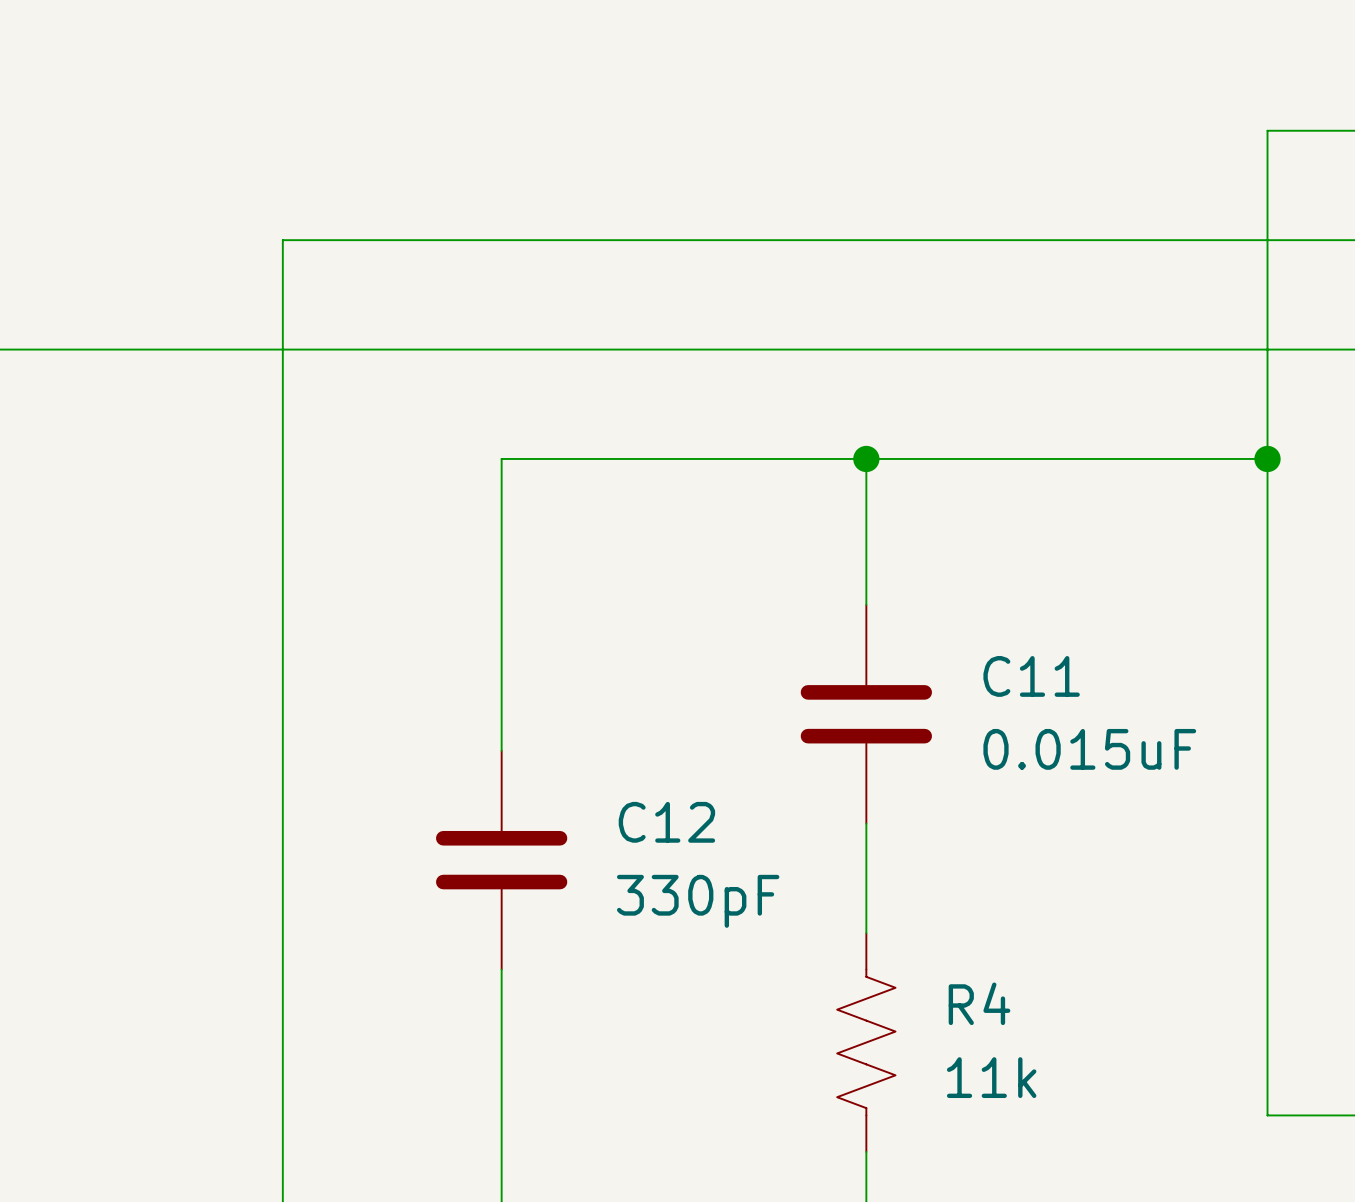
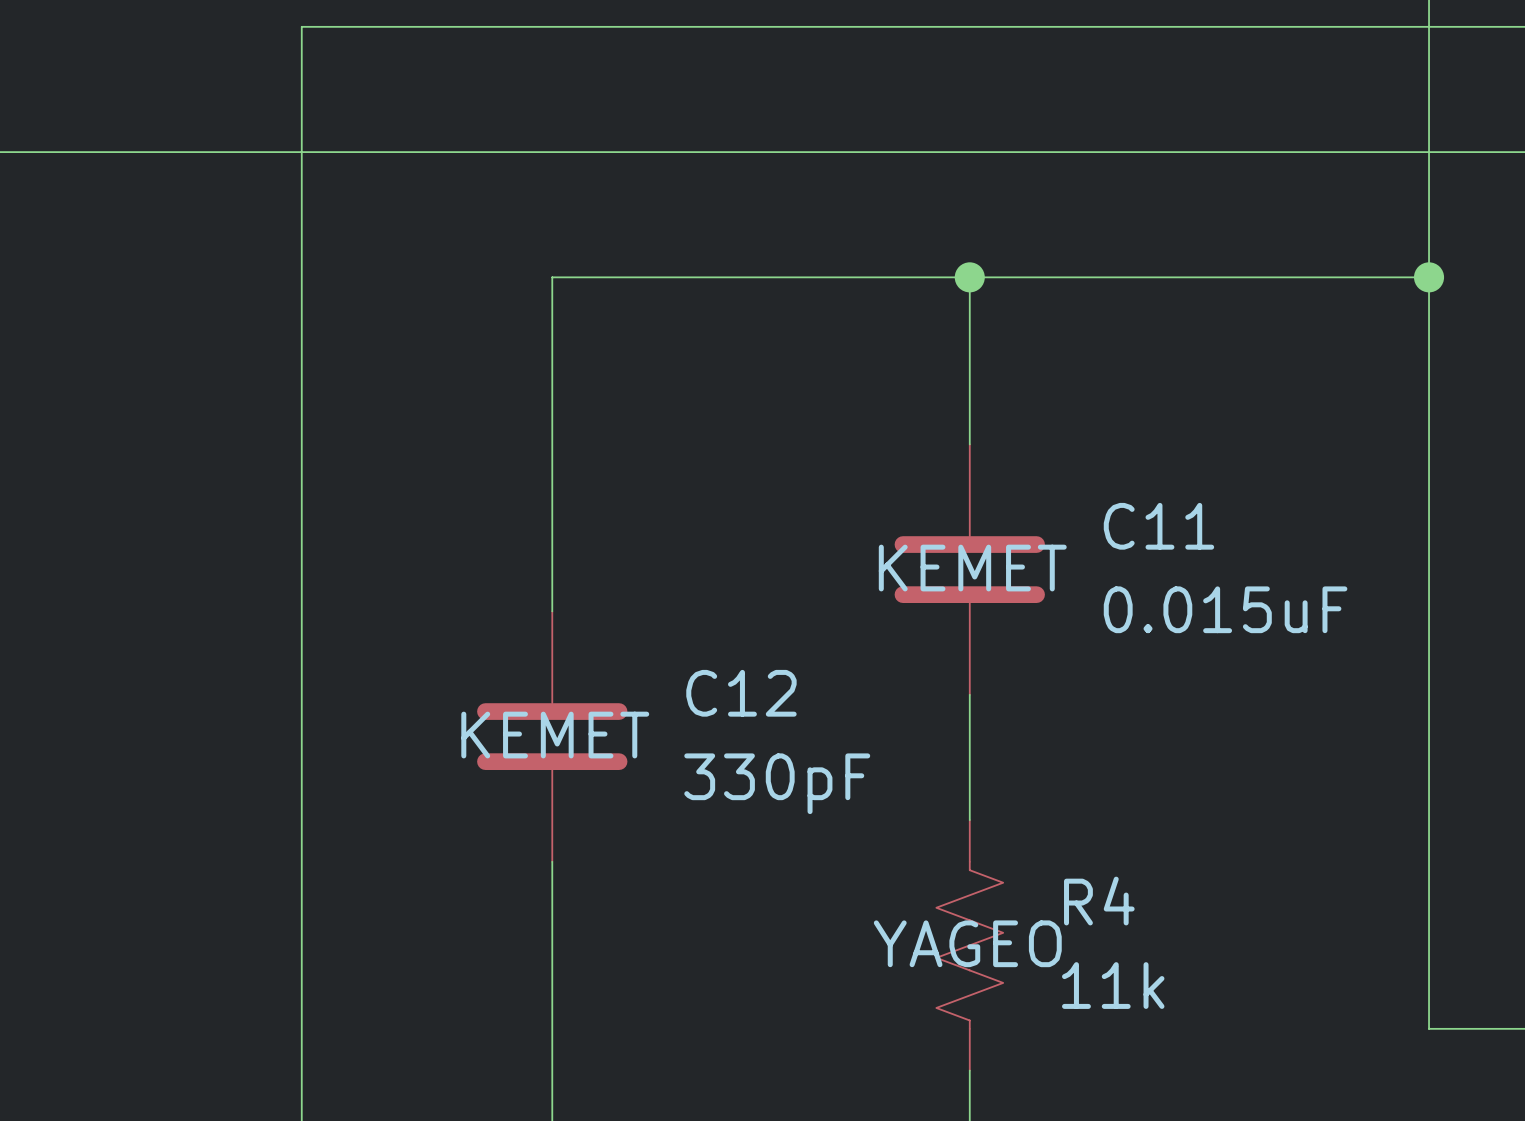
C11 text: none -> KEMET (972, 568)
C12 text: none -> KEMET (555, 735)
R4 text: none -> YAGEO (967, 943)

